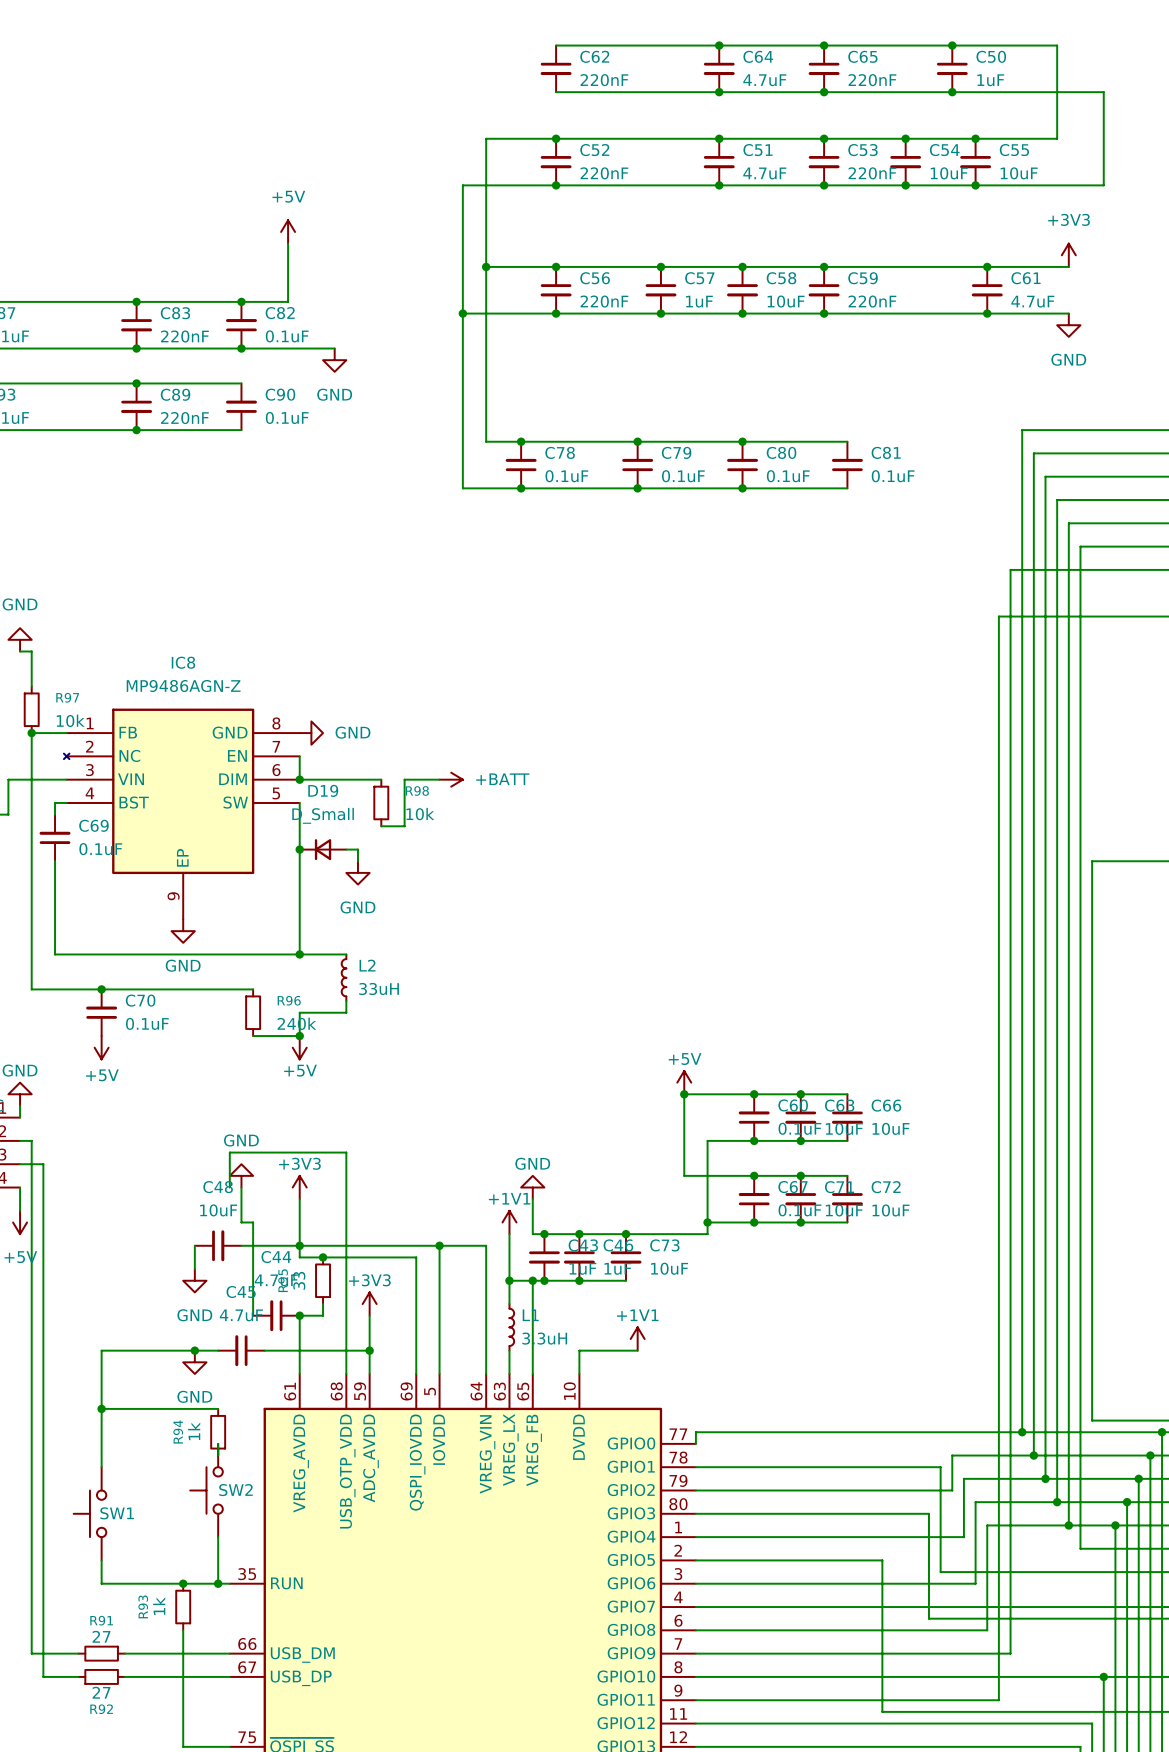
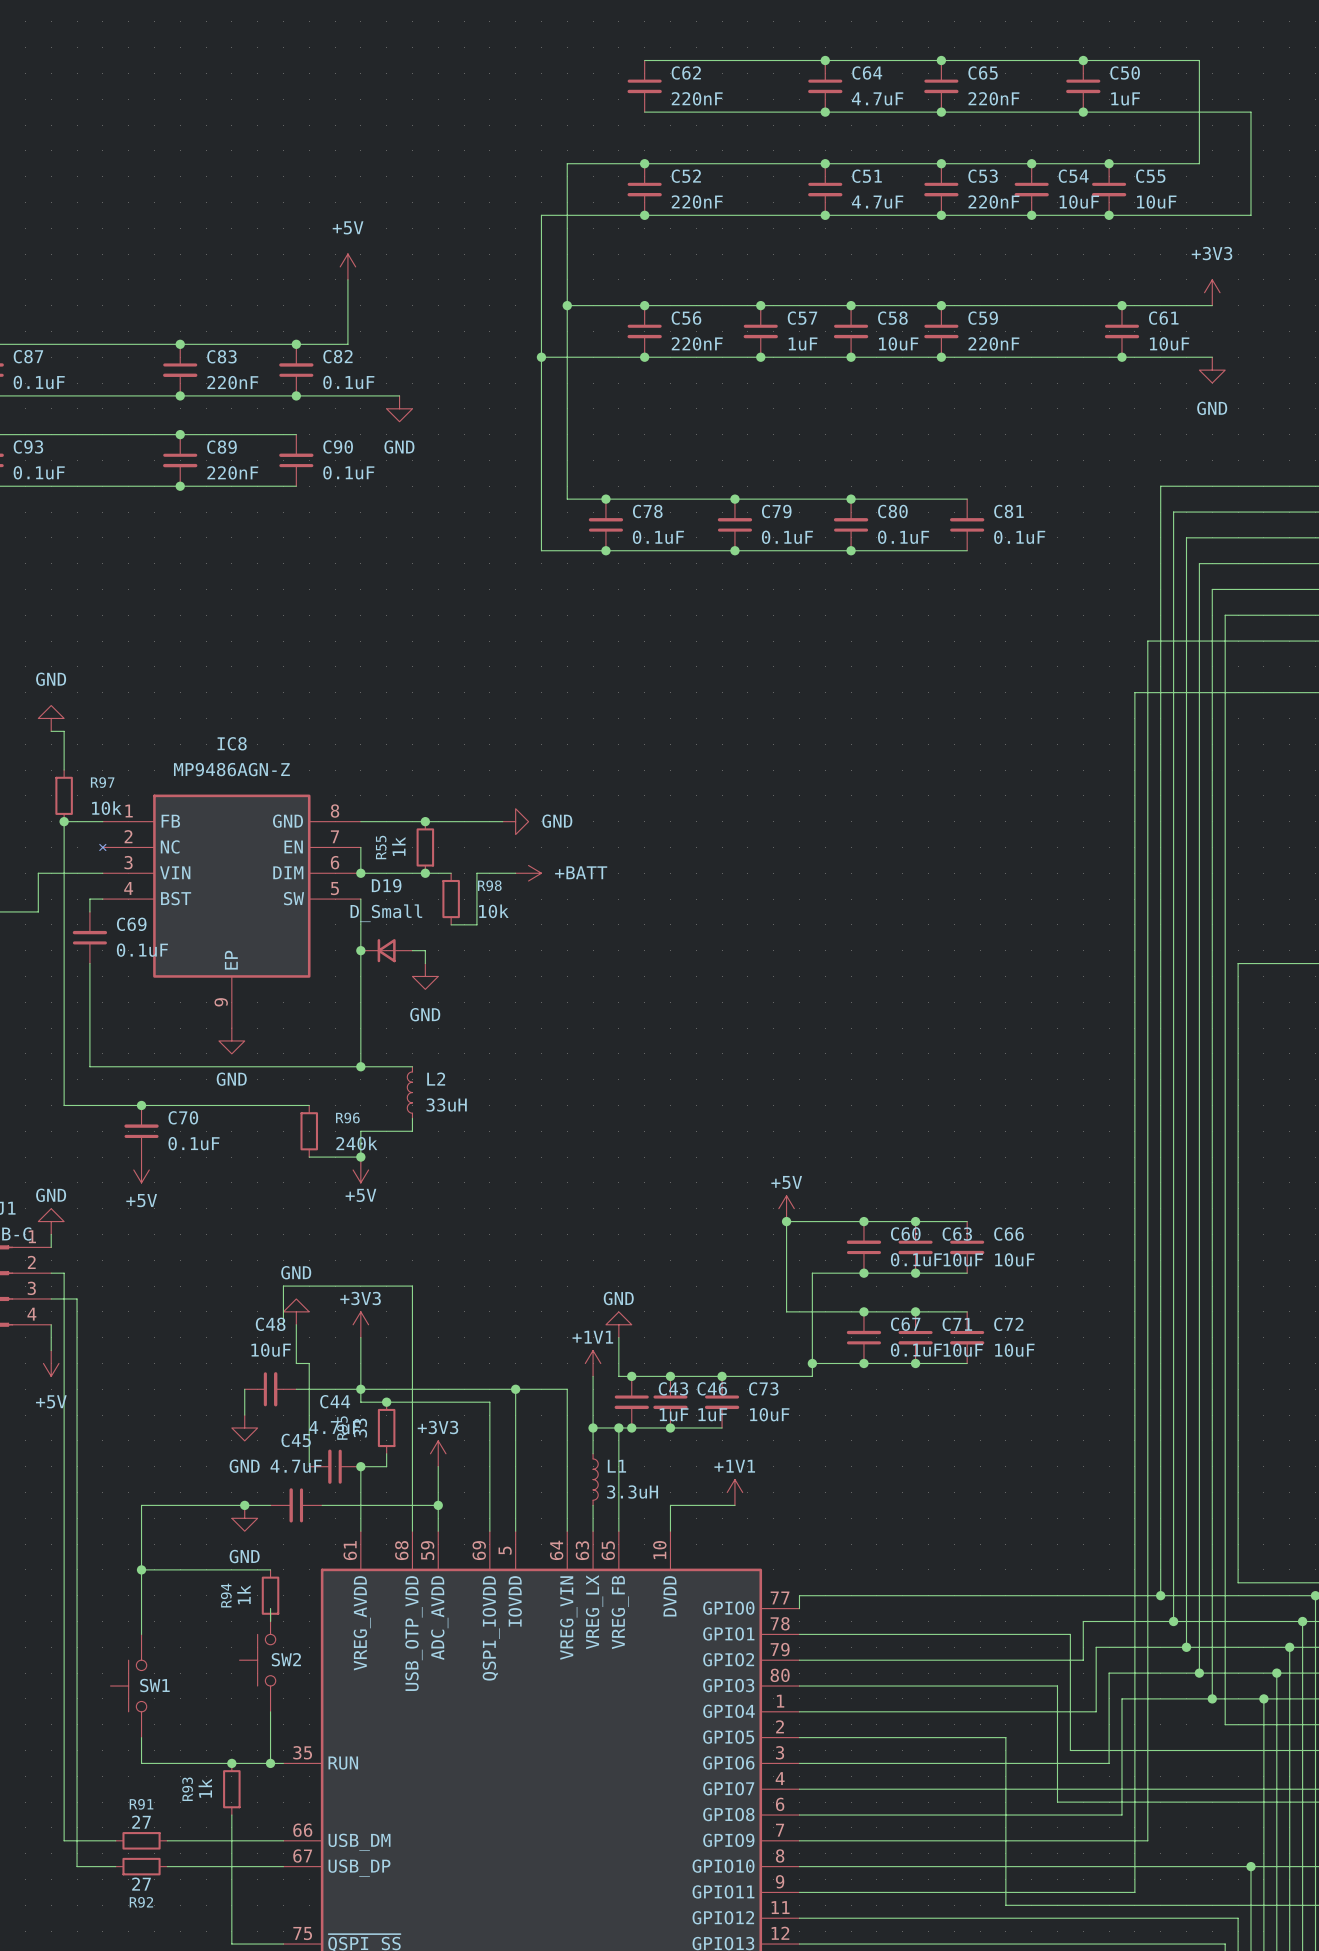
C61 value: 4.7uF (1032, 301) -> 10uF (1169, 343)
wire: none -> (360, 821) (502, 821)
power symbol position: GND (311, 733) -> GND (515, 821)
junction: none -> (425, 821)
R55: none -> 1k (425, 847)
junction: none -> (425, 873)

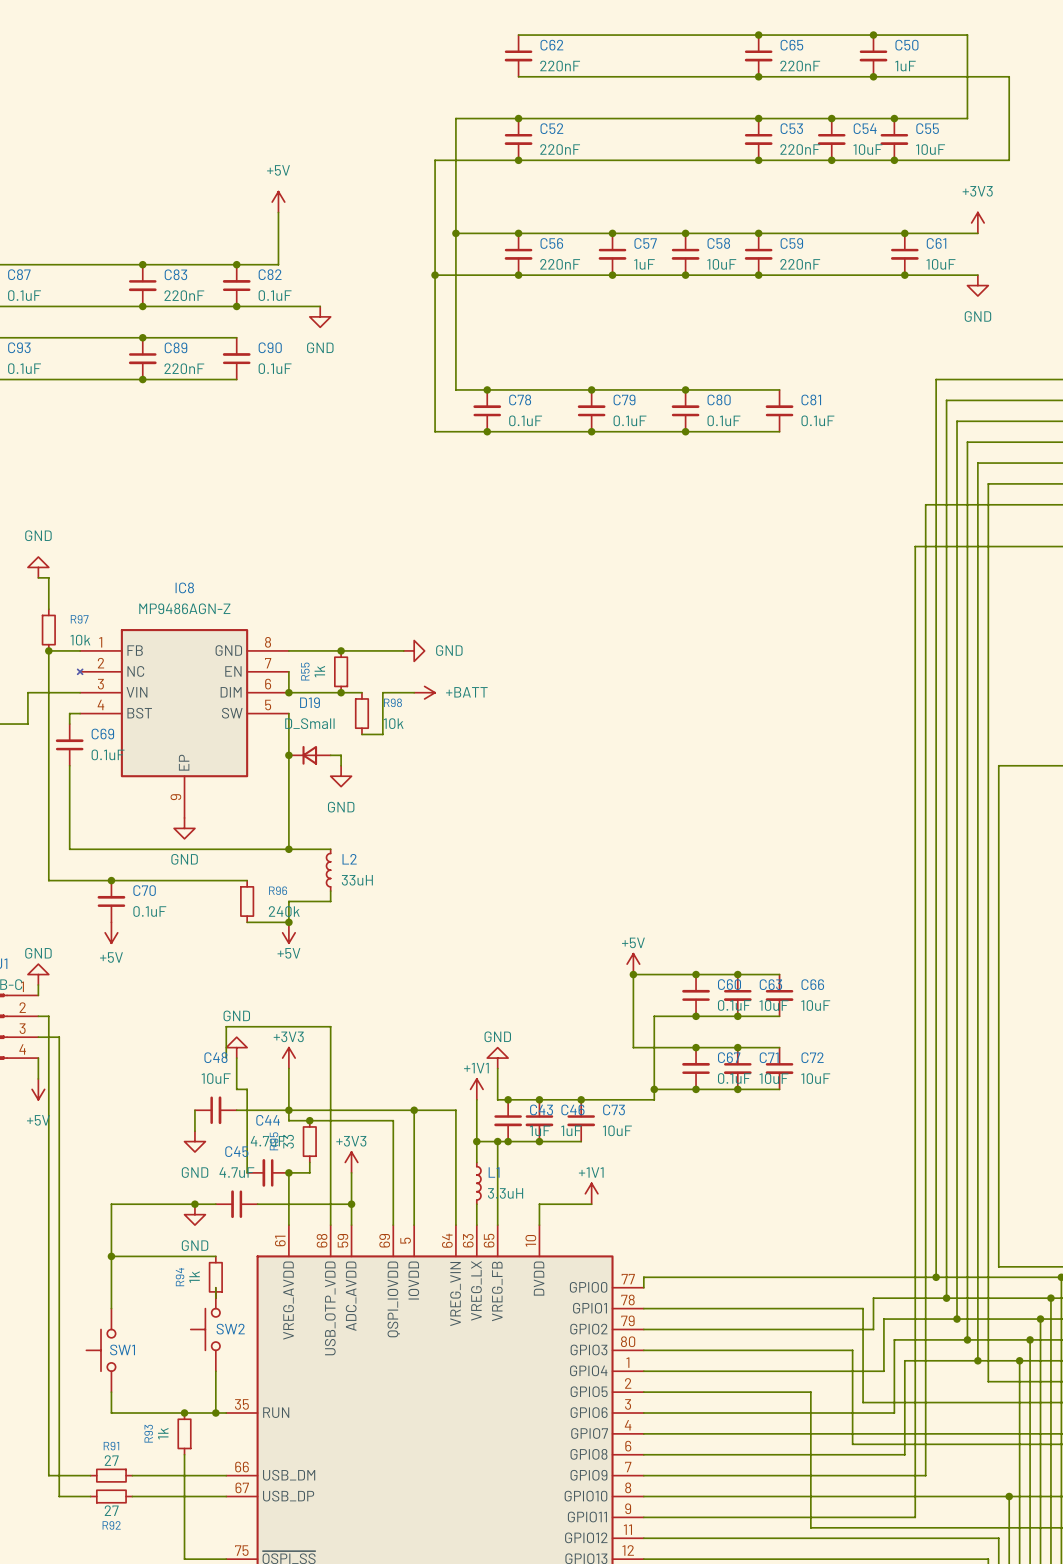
junction: (825, 60) -> none
C64: 4.7uF (825, 86) -> none
junction: (825, 112) -> none
junction: (825, 163) -> none
C51: 4.7uF (825, 189) -> none
junction: (825, 215) -> none

